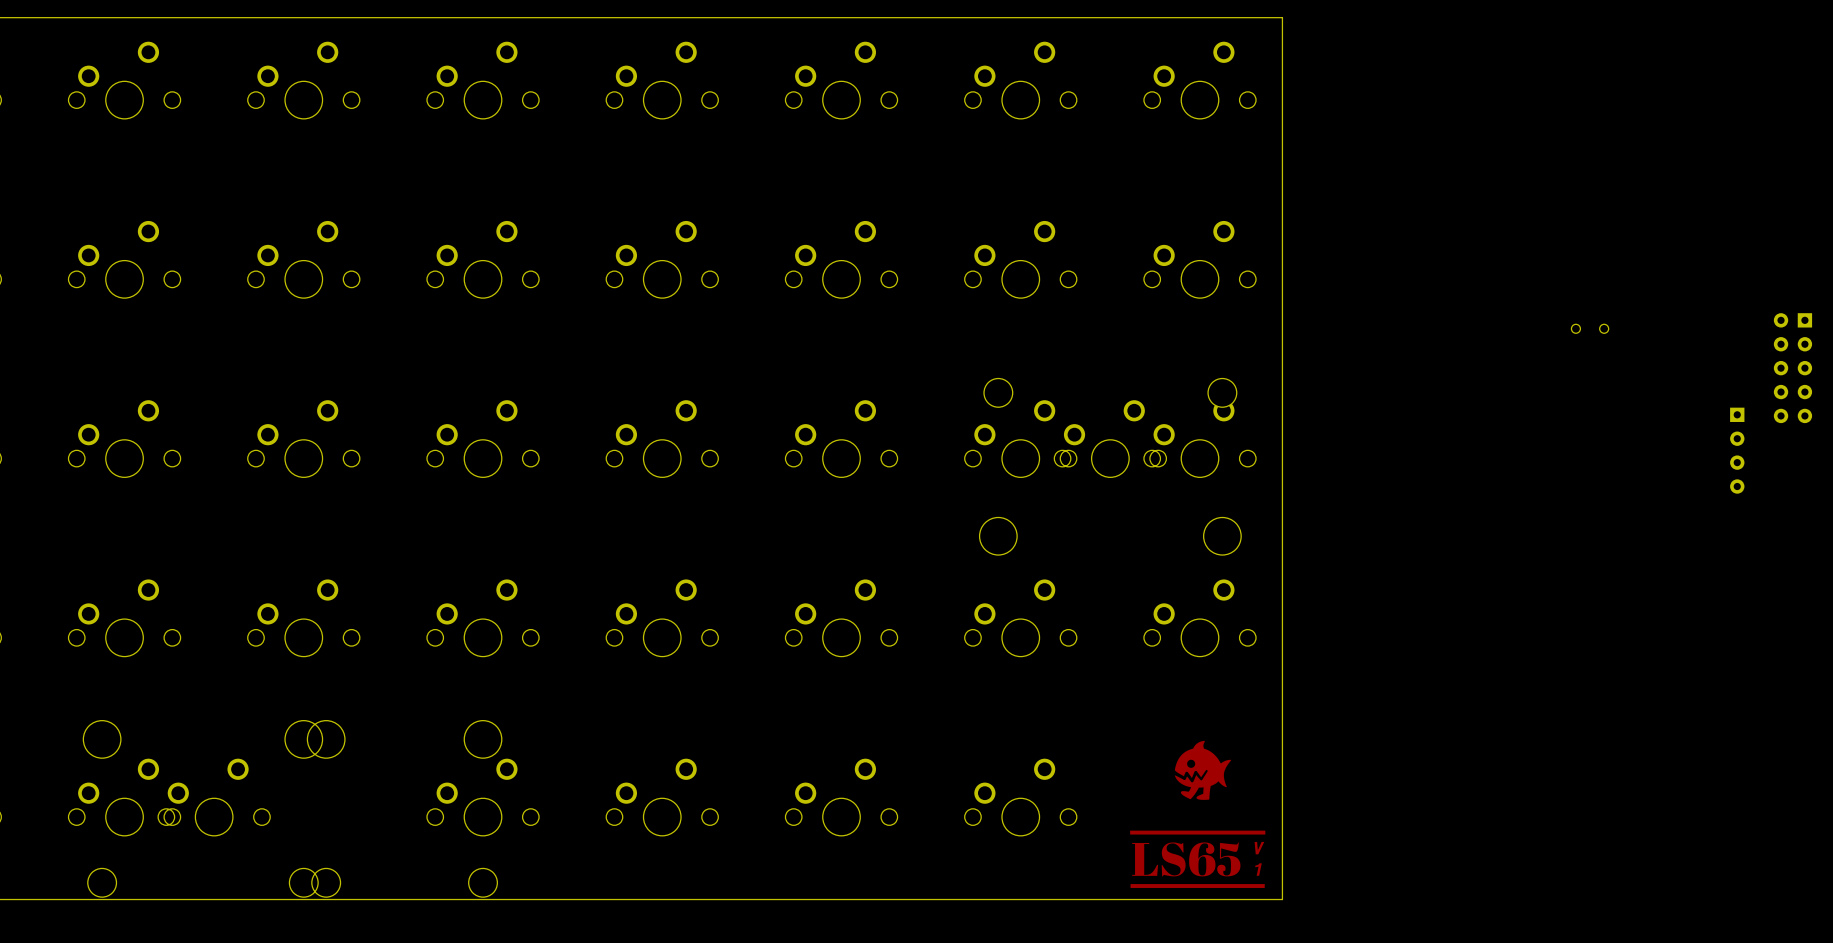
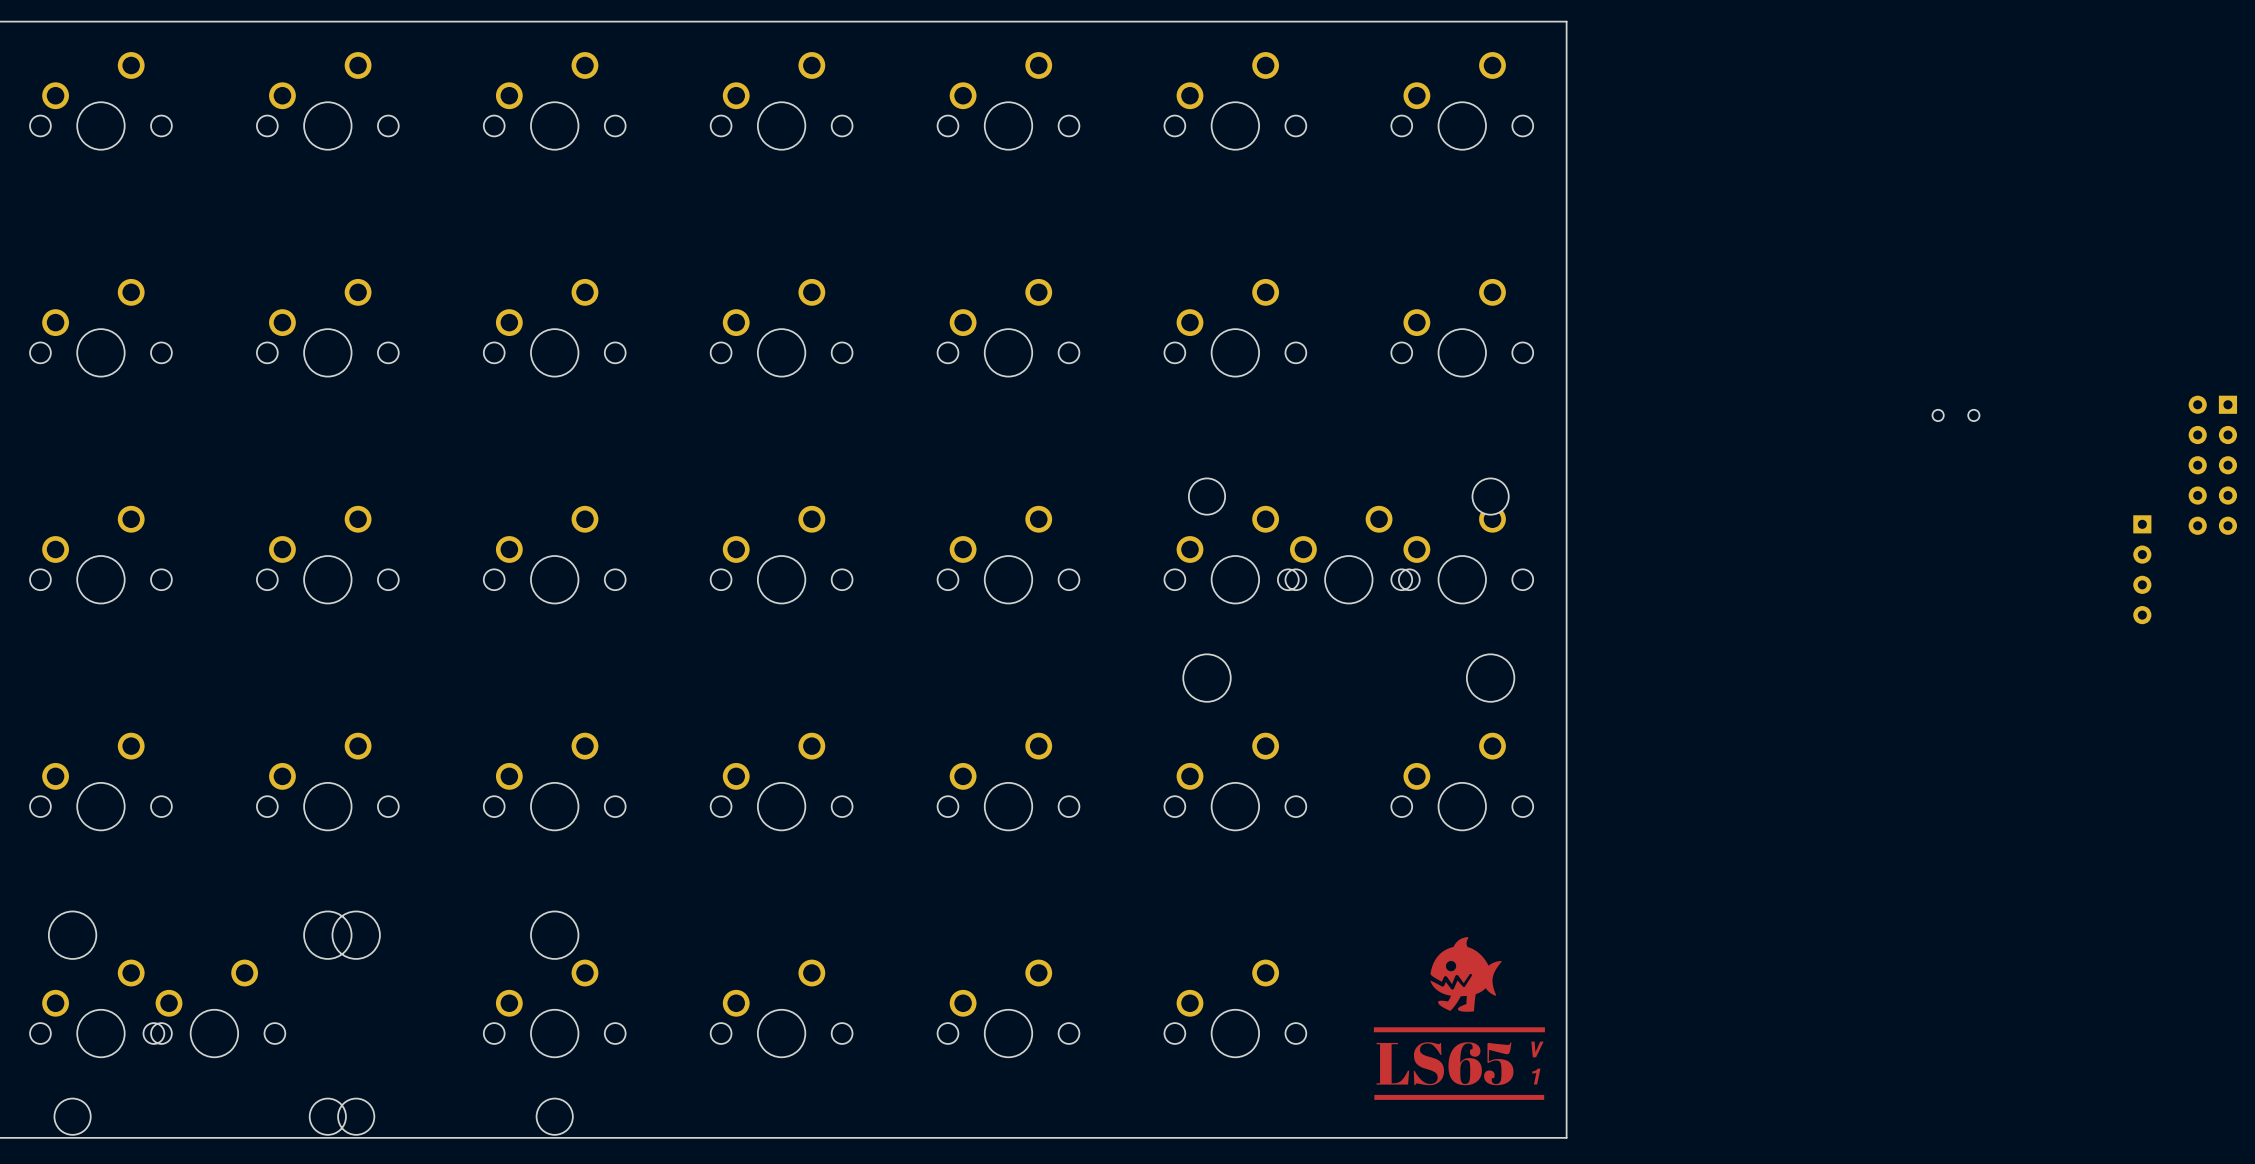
drawing position: (1197, 859) -> (1459, 1063)

